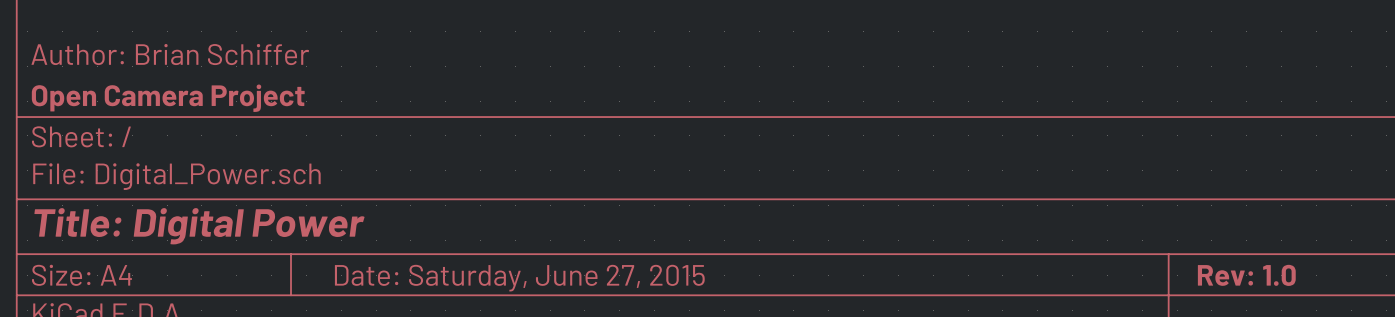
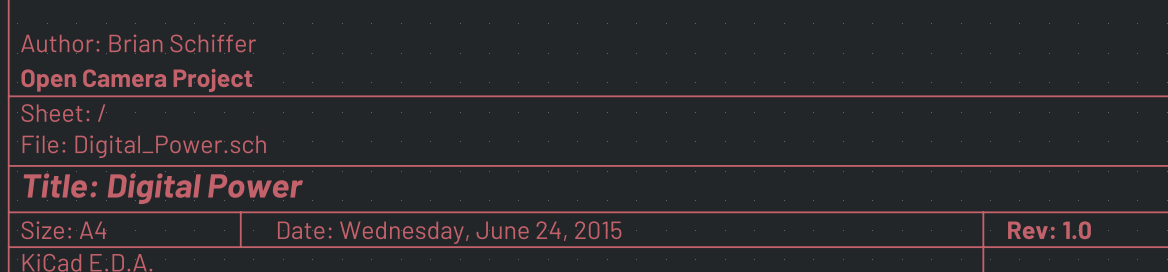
title block: Date: Saturday, June 27, 2015 (519, 278) -> Date: Wednesday, June 24, 2015 (449, 232)

